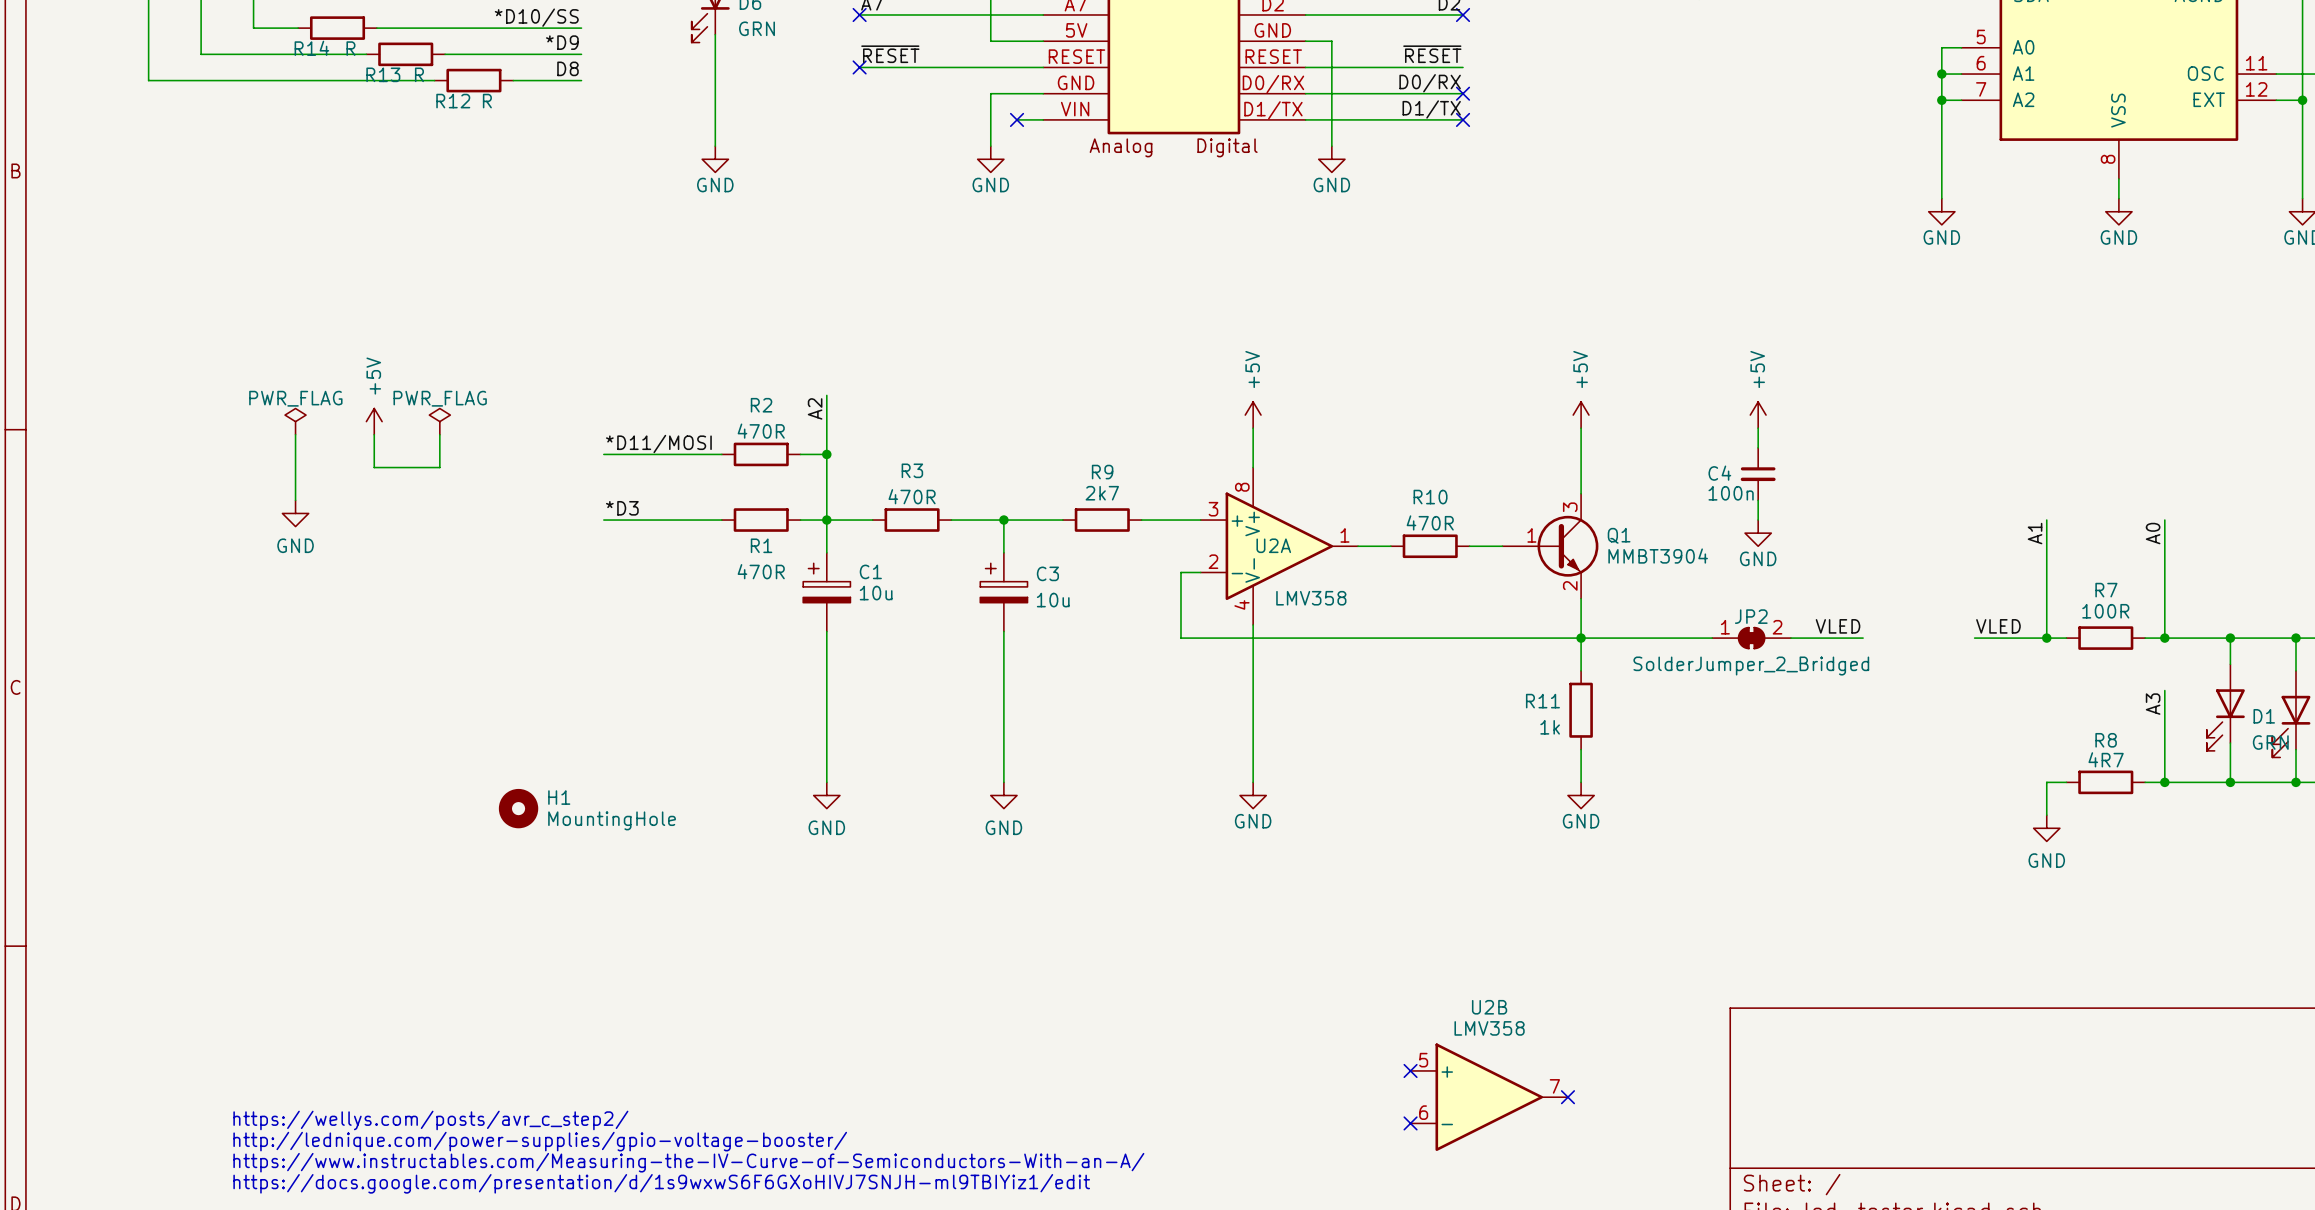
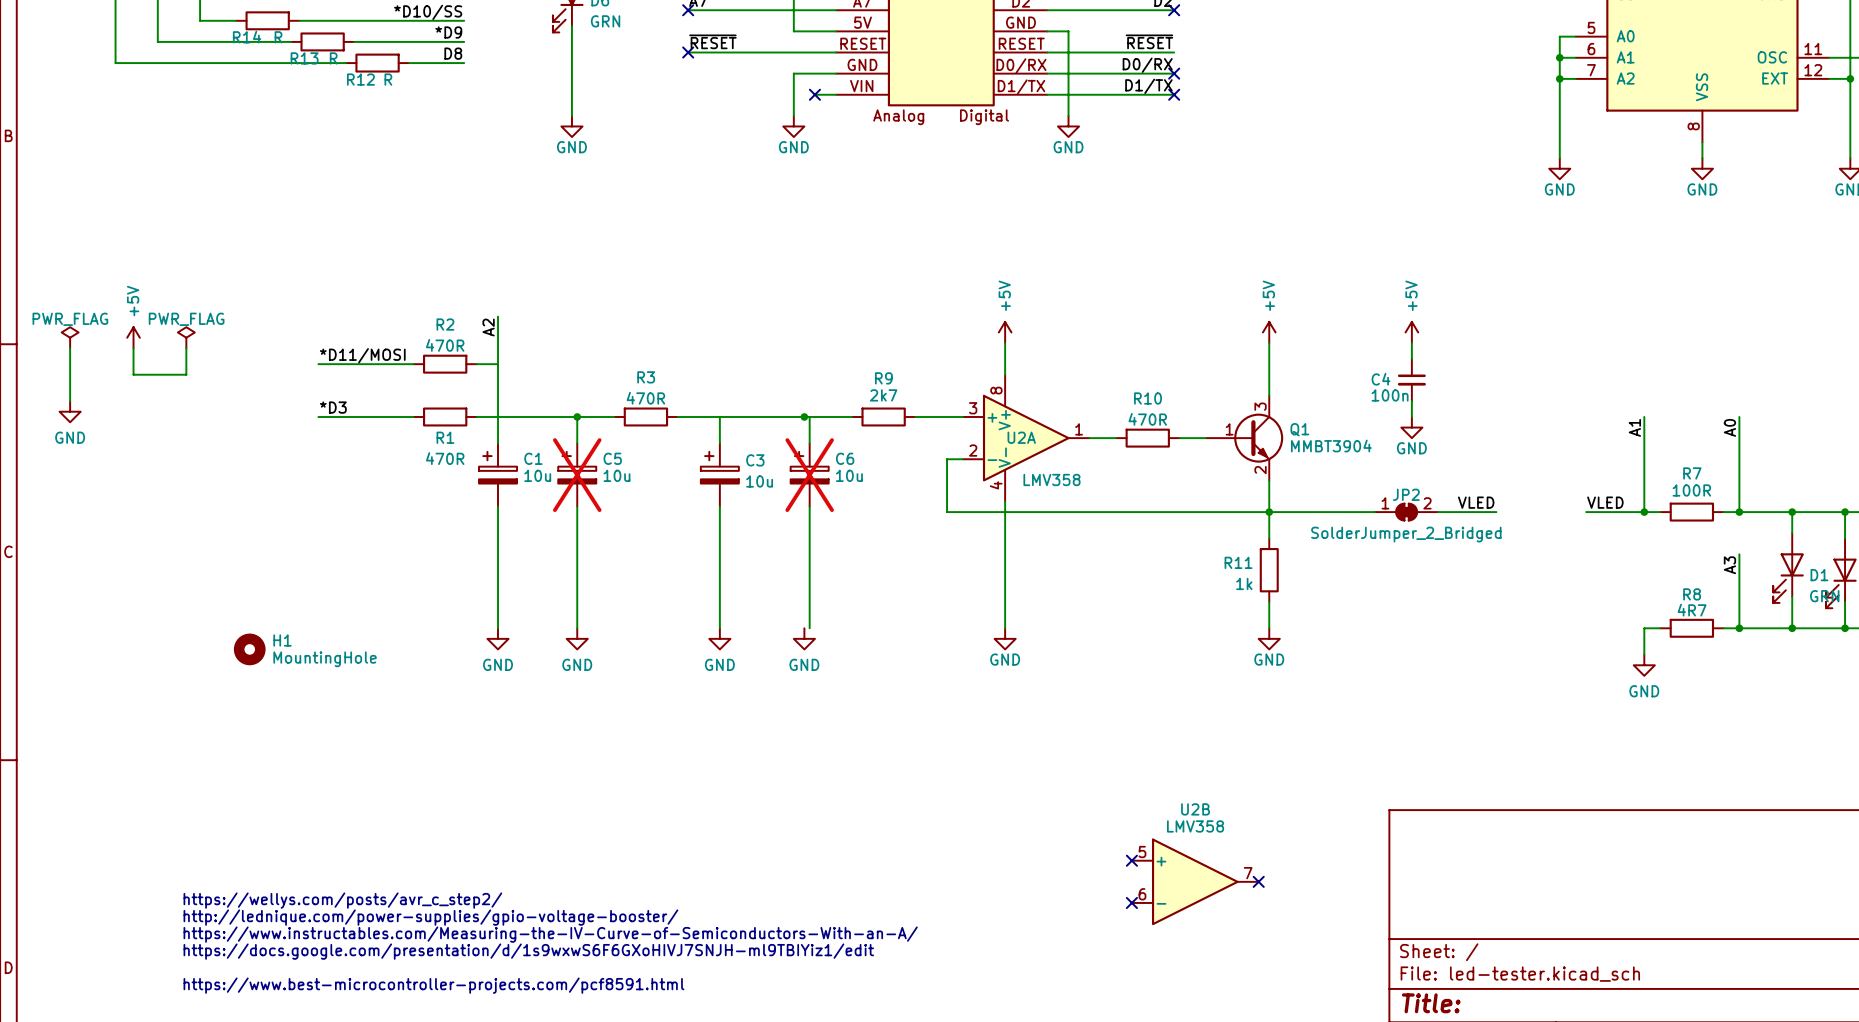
wire: (826, 395) (826, 552) -> (498, 316) (498, 443)
label position: A2 (815, 408) -> A2 (488, 327)
power symbol: none -> PWR_FLAG (70, 337)
power symbol position: PWR_FLAG (295, 421) -> PWR_FLAG (186, 337)
power symbol position: +5V (374, 421) -> +5V (133, 337)
power symbol: PWR_FLAG (439, 421) -> none
wire: (295, 434) (295, 500) -> (70, 348) (70, 401)
wire: (374, 434) (374, 467) (439, 467) (439, 434) -> (133, 348) (133, 374) (186, 374) (186, 348)
label position: *D11/MOSI (658, 443) -> *D11/MOSI (362, 355)
wire: none -> (318, 364) (413, 364)
wire: none -> (476, 364) (482, 364)
wire: (623, 454) (721, 454) -> none
R2 position: (761, 454) -> (445, 364)
wire: (800, 454) (826, 454) -> none
junction: (826, 454) -> none
label position: *D3 (622, 508) -> *D3 (333, 407)
power symbol position: GND (295, 513) -> GND (70, 411)
wire: none -> (318, 416) (413, 416)
wire: none -> (476, 416) (482, 416)
junction: none -> (577, 416)
R1 position: (761, 520) -> (445, 416)
wire: none -> (614, 416) (577, 416) (577, 443)
wire: (800, 520) (846, 520) -> none
junction: (826, 520) -> none
wire: none -> (698, 416) (762, 416)
R3 position: (912, 520) -> (645, 416)
wire: (1003, 520) (1003, 552) -> (719, 416) (719, 443)
wire: none -> (809, 416) (809, 443)
C5: none -> 10u (577, 475)
C1 position: (826, 592) -> (498, 475)
C3 position: (1003, 592) -> (719, 475)
C6: none -> 10u (809, 475)
wire: none -> (577, 506) (577, 628)
wire: (826, 631) (826, 782) -> (498, 506) (498, 628)
wire: (1003, 631) (1003, 782) -> (719, 506) (719, 628)
wire: none -> (809, 506) (809, 628)
power symbol: none -> GND (498, 638)
power symbol: none -> GND (577, 638)
power symbol: GND (826, 795) -> none
power symbol: none -> GND (719, 638)
H1 position: (518, 808) -> (249, 649)

